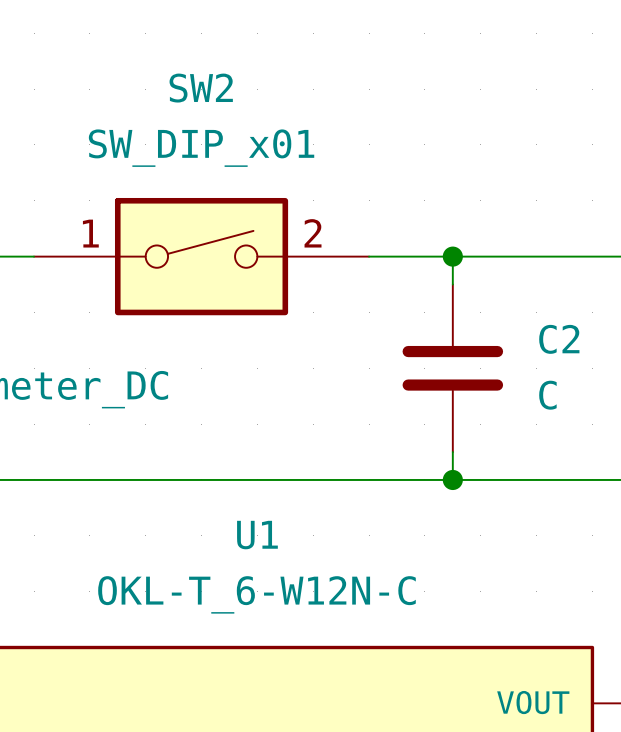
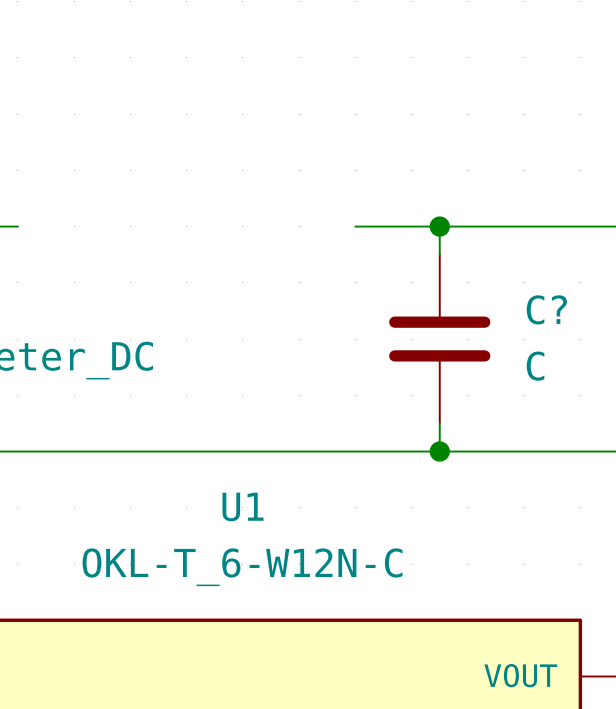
SW2: SW_DIP_x01 (201, 256) -> none
C2 name: C2 (559, 339) -> C? (546, 309)

